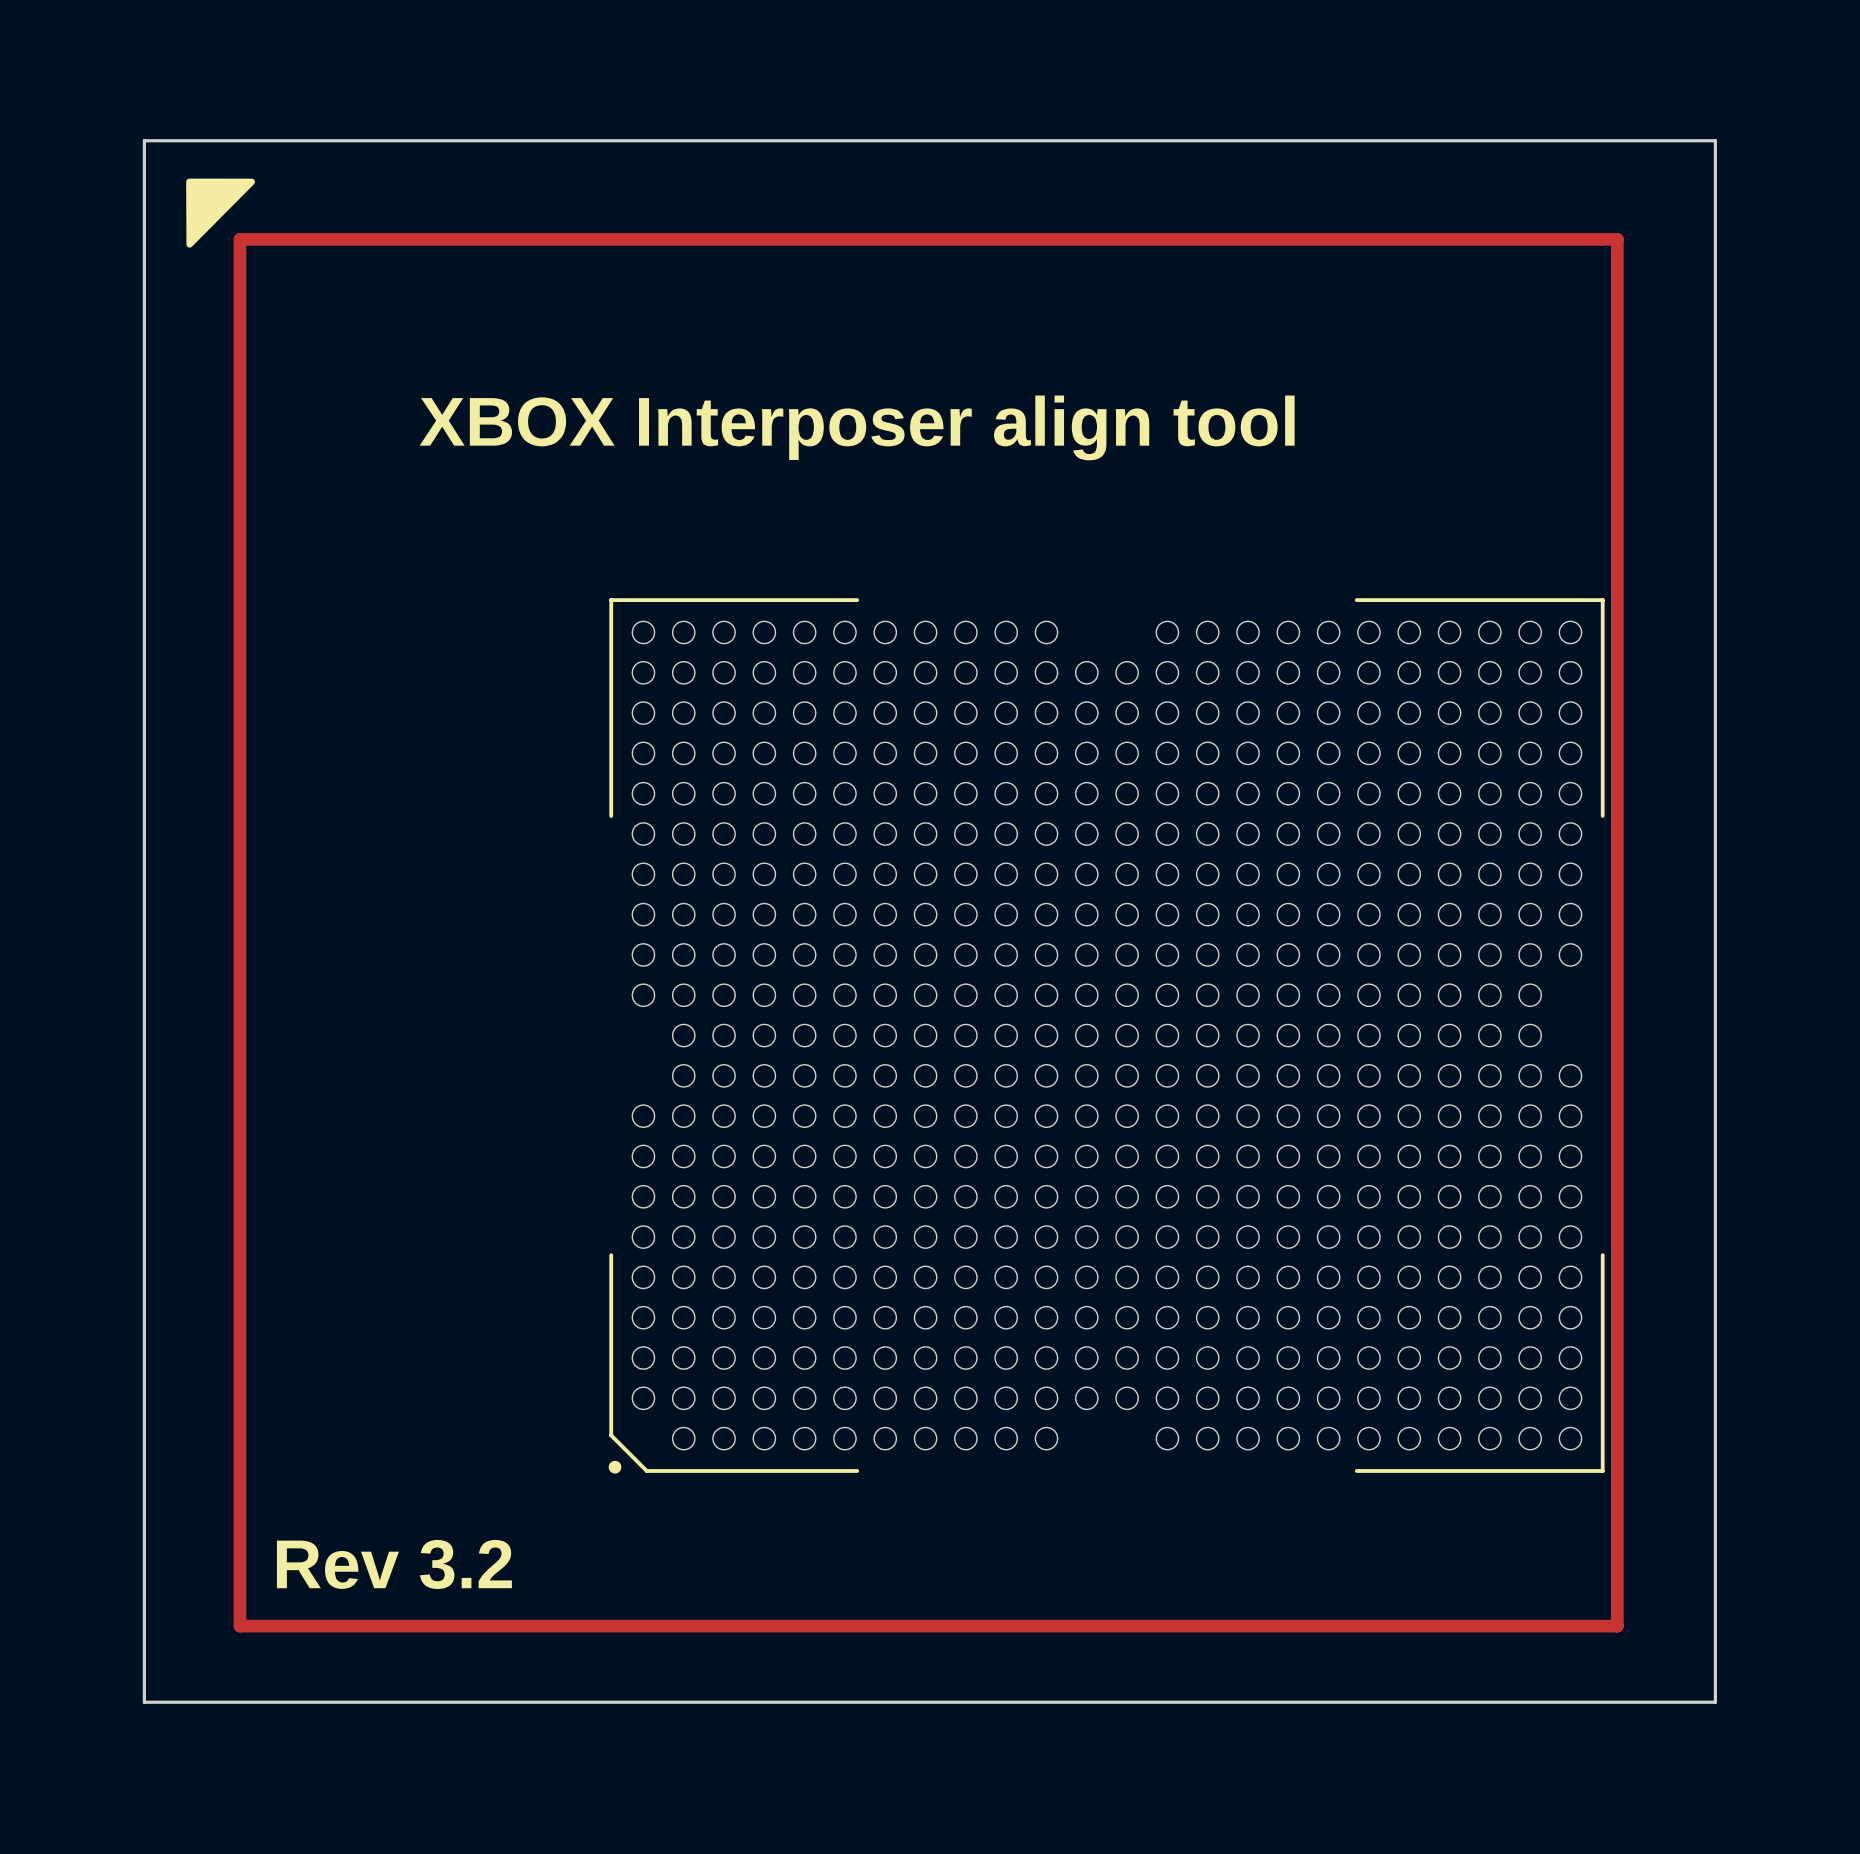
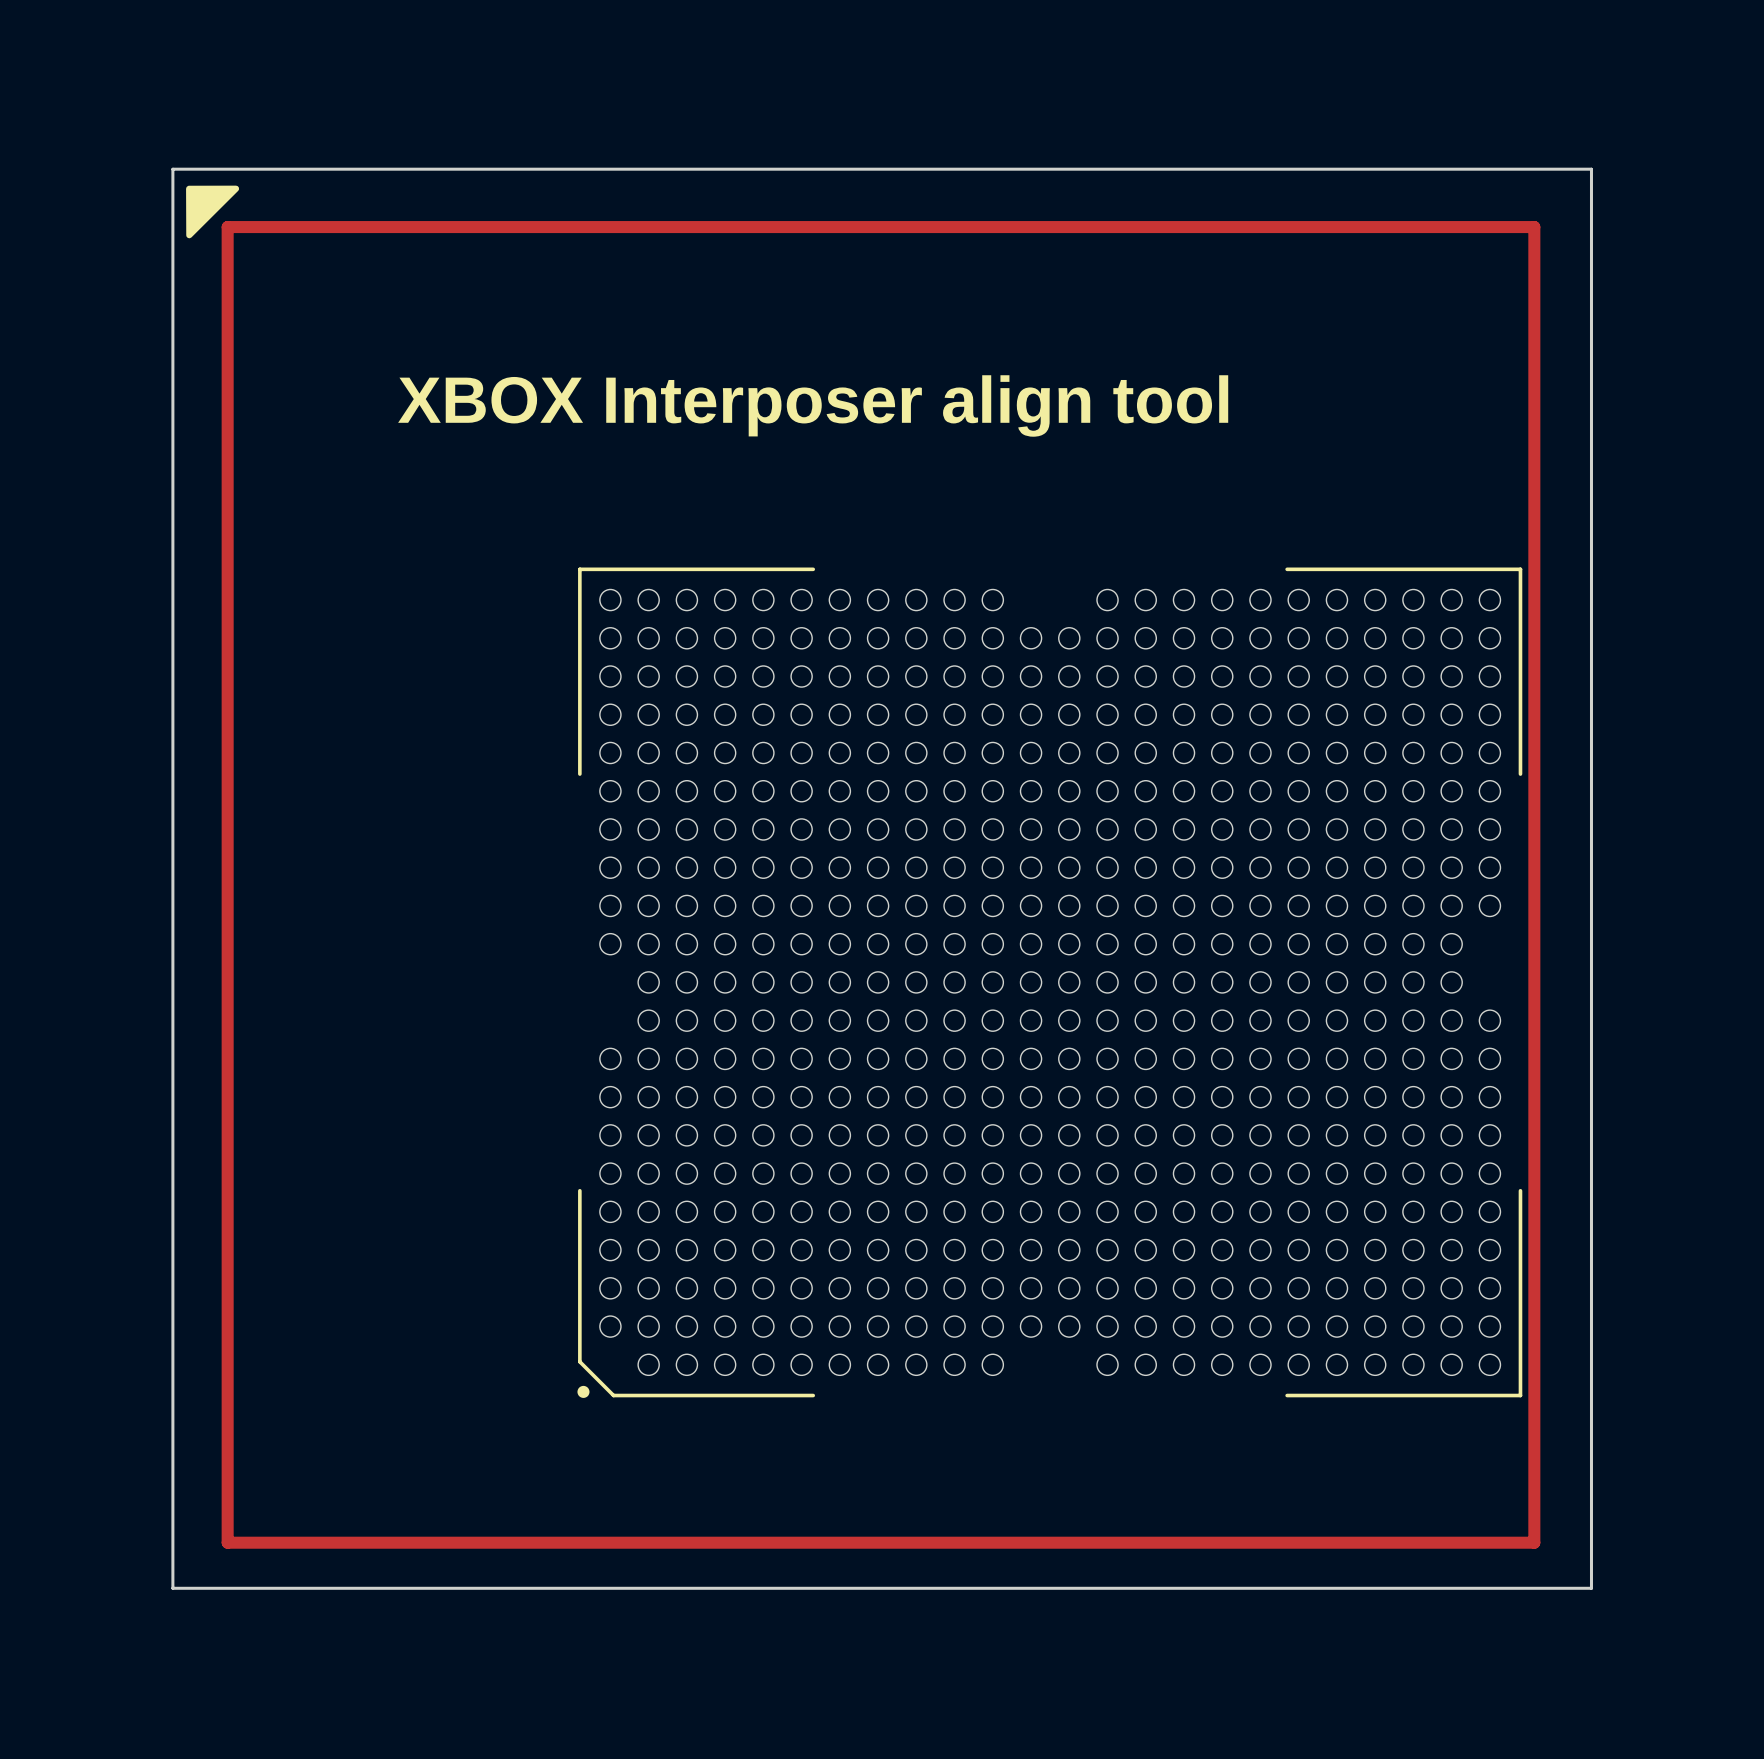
board edge: (144, 140) (1715, 140) (1715, 1702) (144, 1702) (144, 140) -> (172, 169) (172, 1588) (1591, 1588) (1591, 169) (172, 169)
drawing shape: [186, 178, 255, 248] -> [186, 185, 239, 239]
text: Rev 3.2 (394, 1564) -> none

